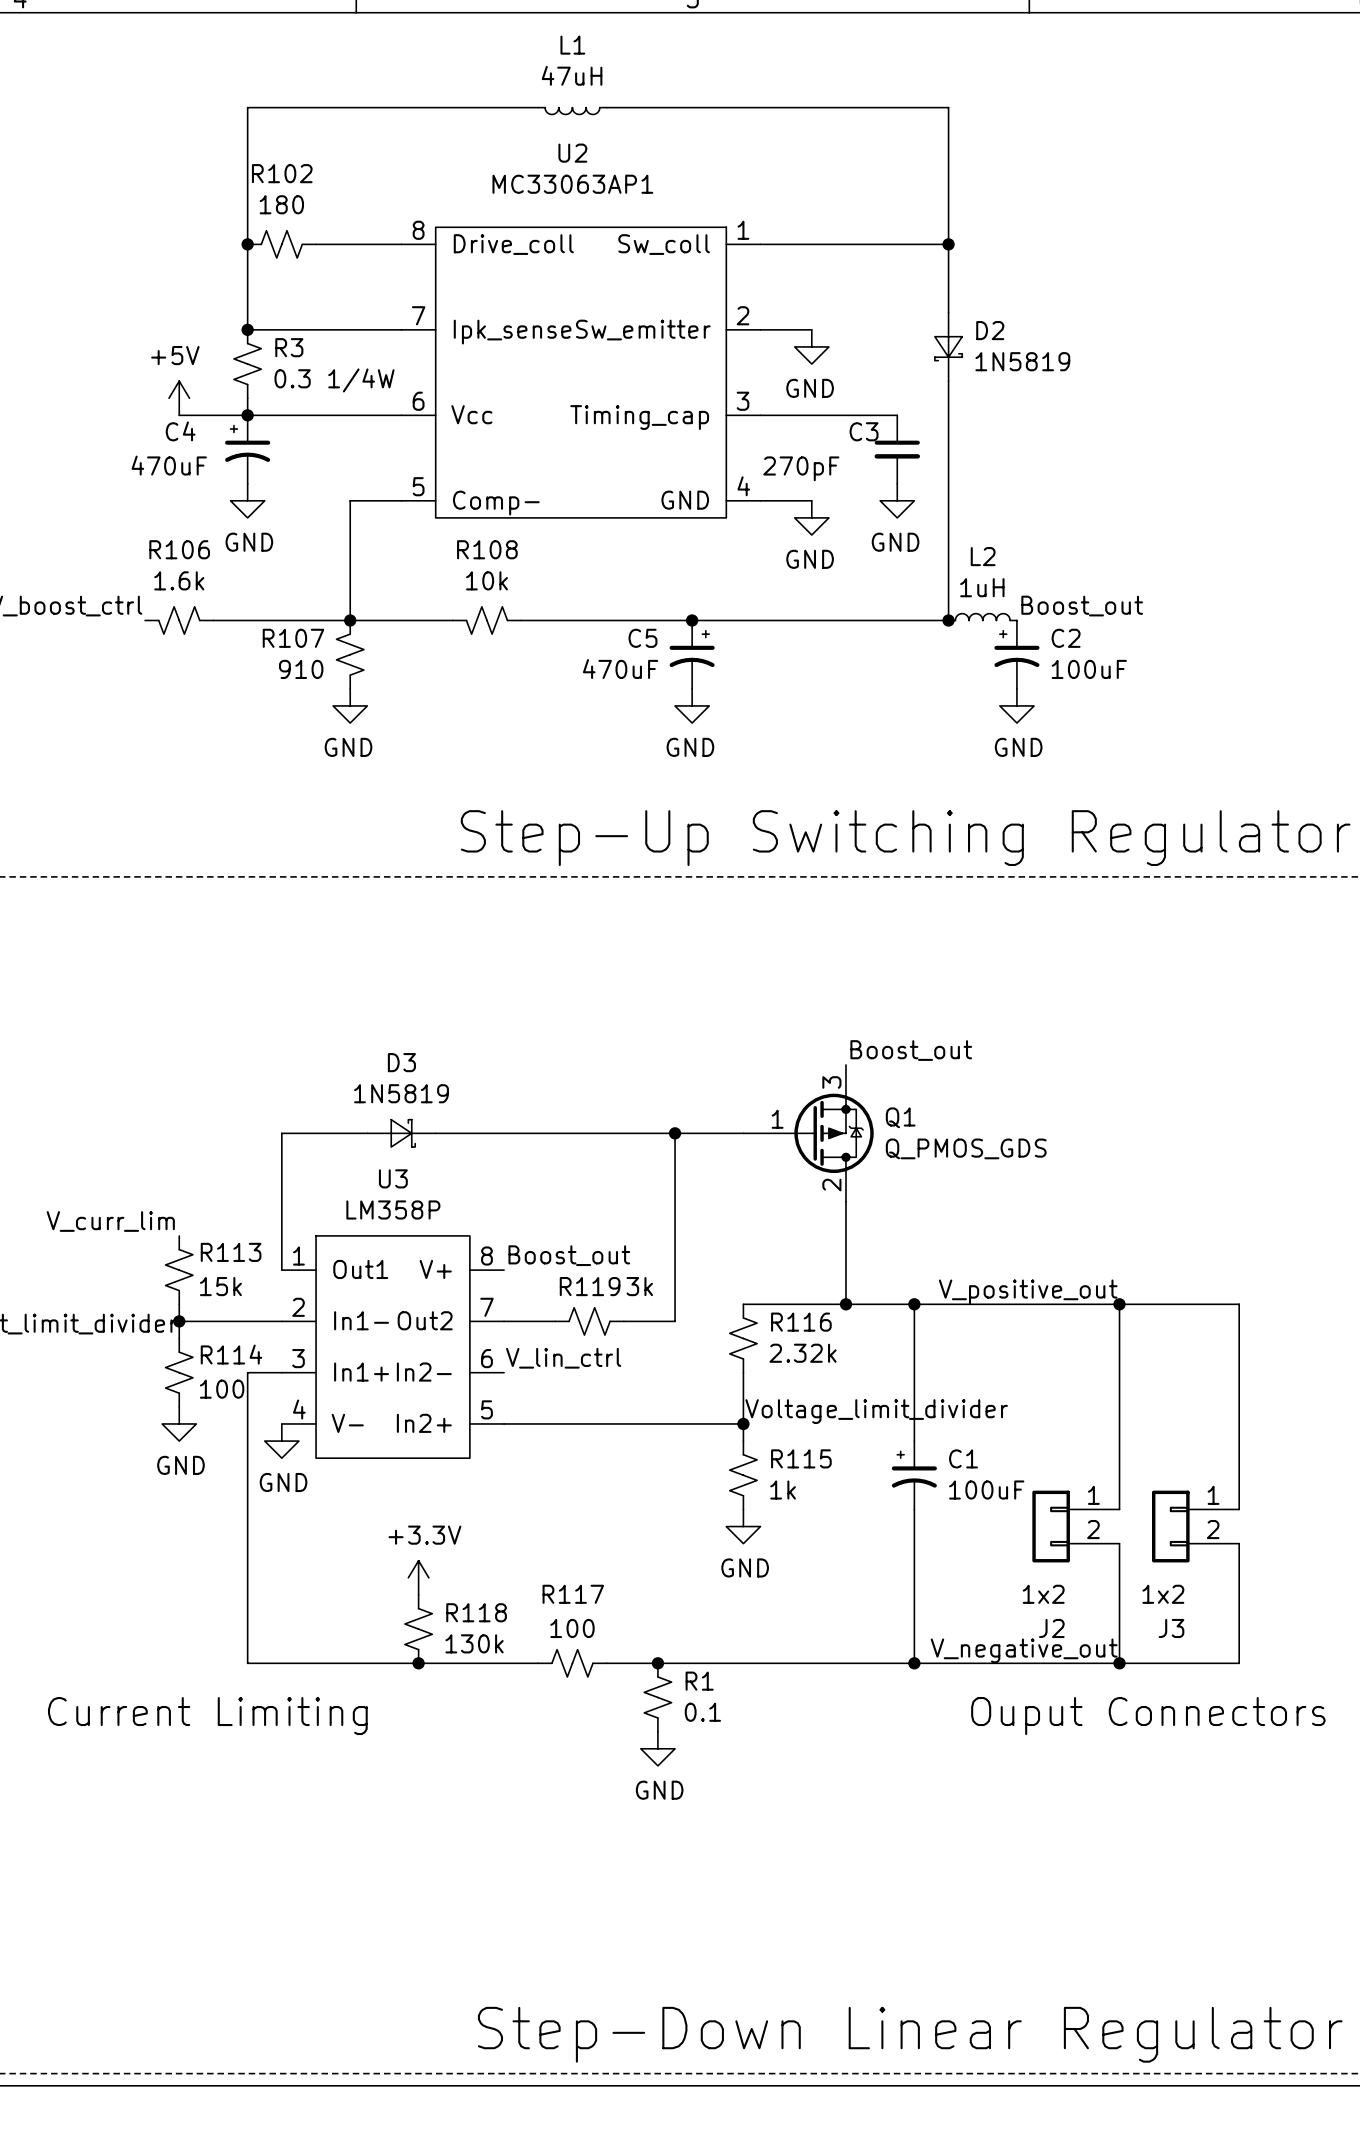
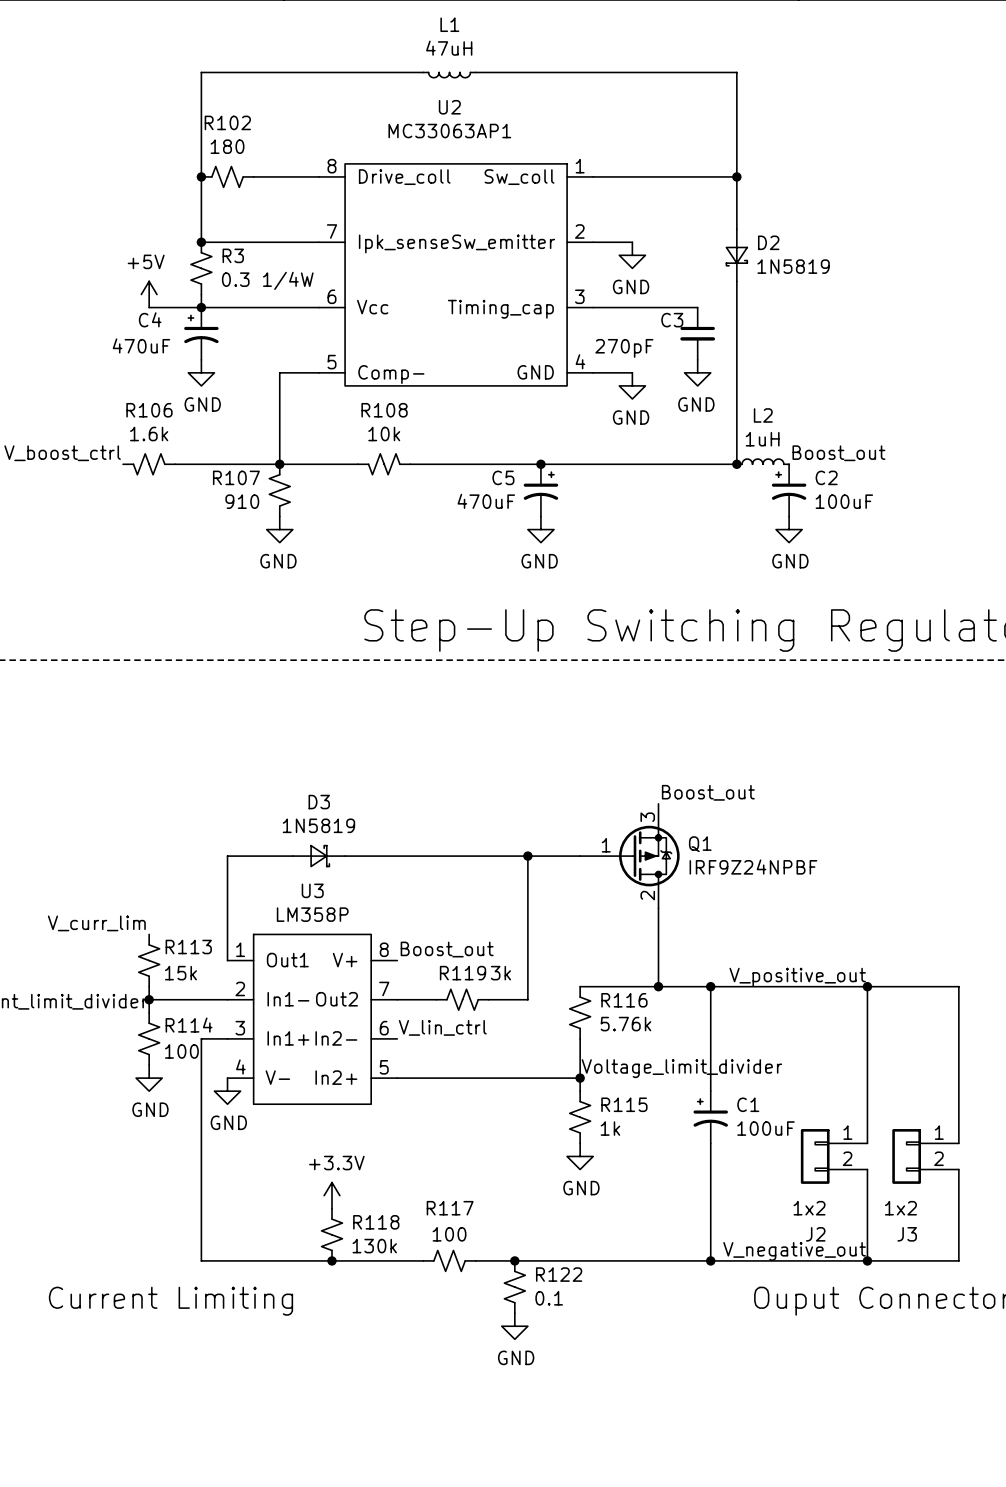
Q1 value: Q_PMOS_GDS (966, 1148) -> IRF9Z24NPBF (753, 867)
R116 value: 2.32k (803, 1353) -> 5.76k (625, 1024)
R1 name: R1 (699, 1681) -> R122 (559, 1274)

